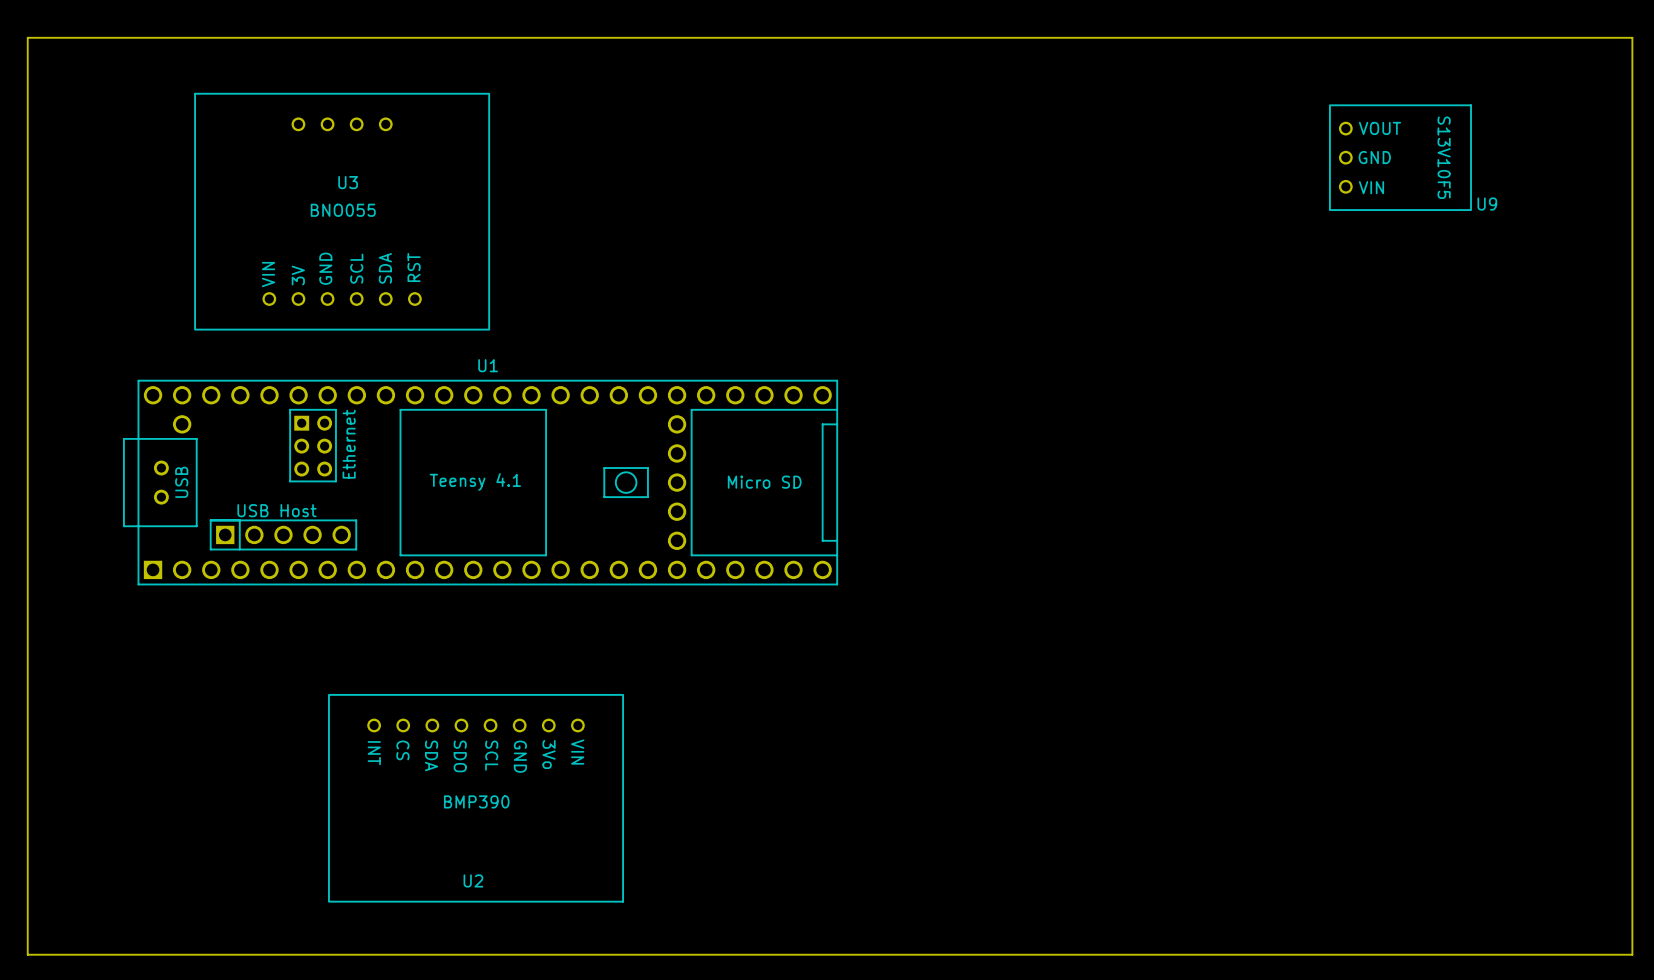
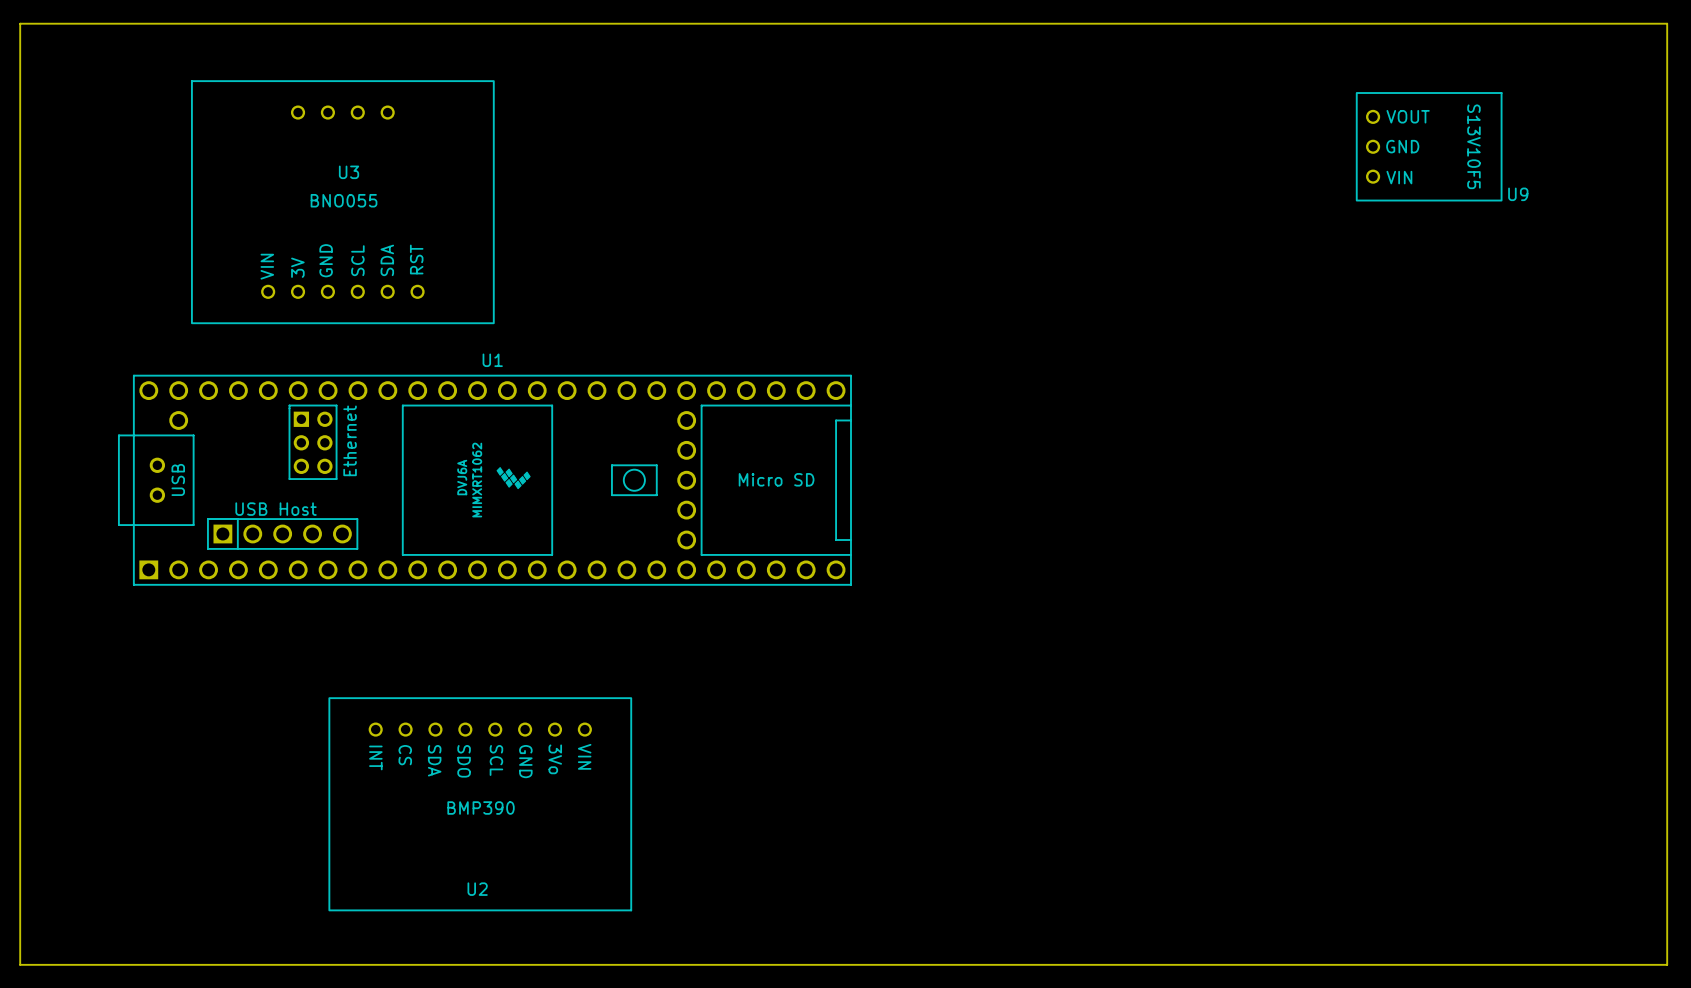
U1 footprint: [123, 379, 839, 586] -> [118, 374, 852, 586]

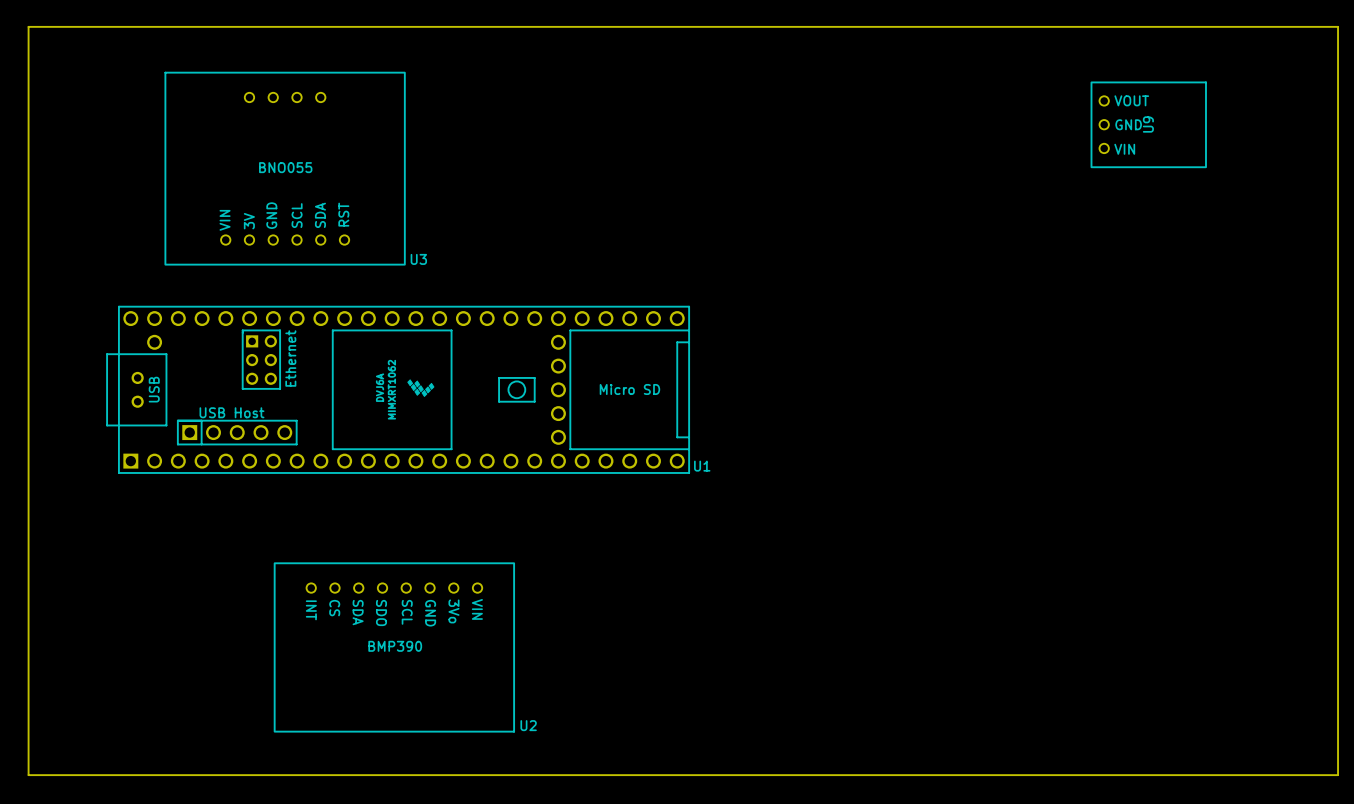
U3 footprint: [191, 80, 495, 325] -> [164, 72, 406, 266]
U9 footprint: [1355, 92, 1503, 202] -> [1091, 81, 1207, 168]
U3 name position: U3 (349, 172) -> U3 (418, 259)
U9 name position: U9 (1518, 194) -> U9 (1148, 124)
U1 name position: U1 (492, 360) -> U1 (702, 466)
U2 footprint: [328, 697, 633, 912] -> [274, 562, 515, 733]
U2 name position: U2 (477, 889) -> U2 (528, 725)

